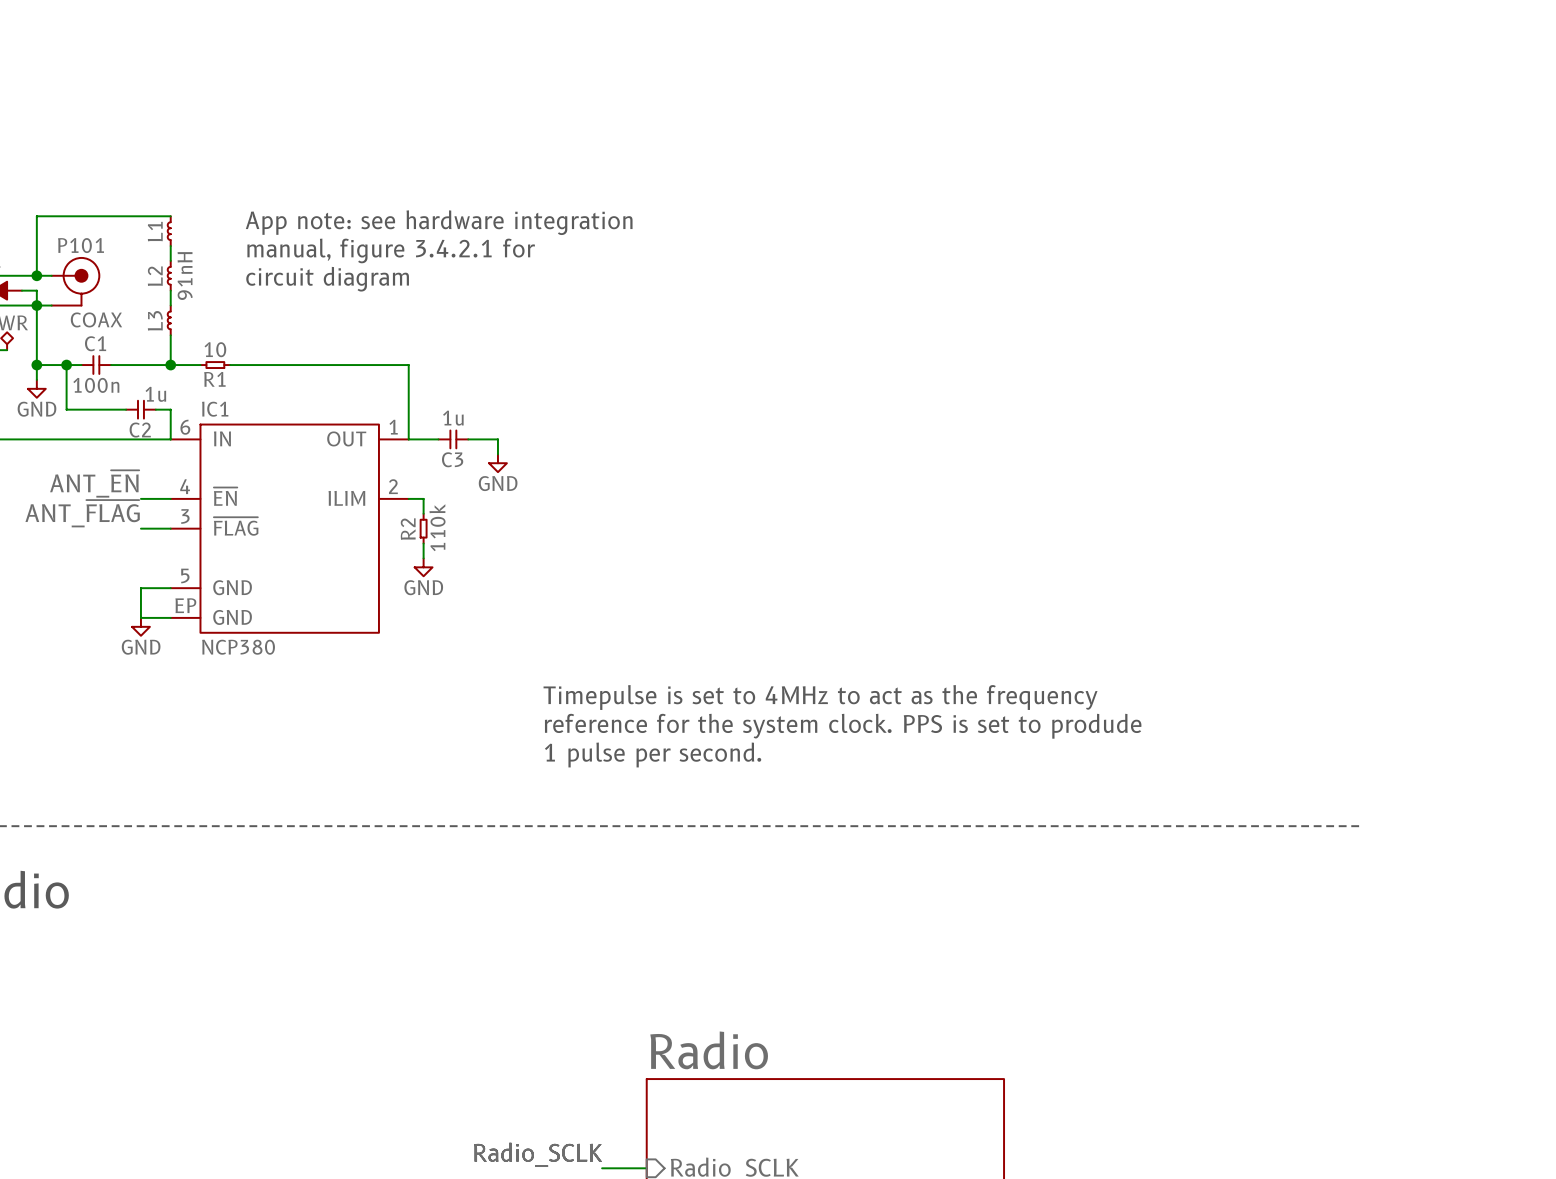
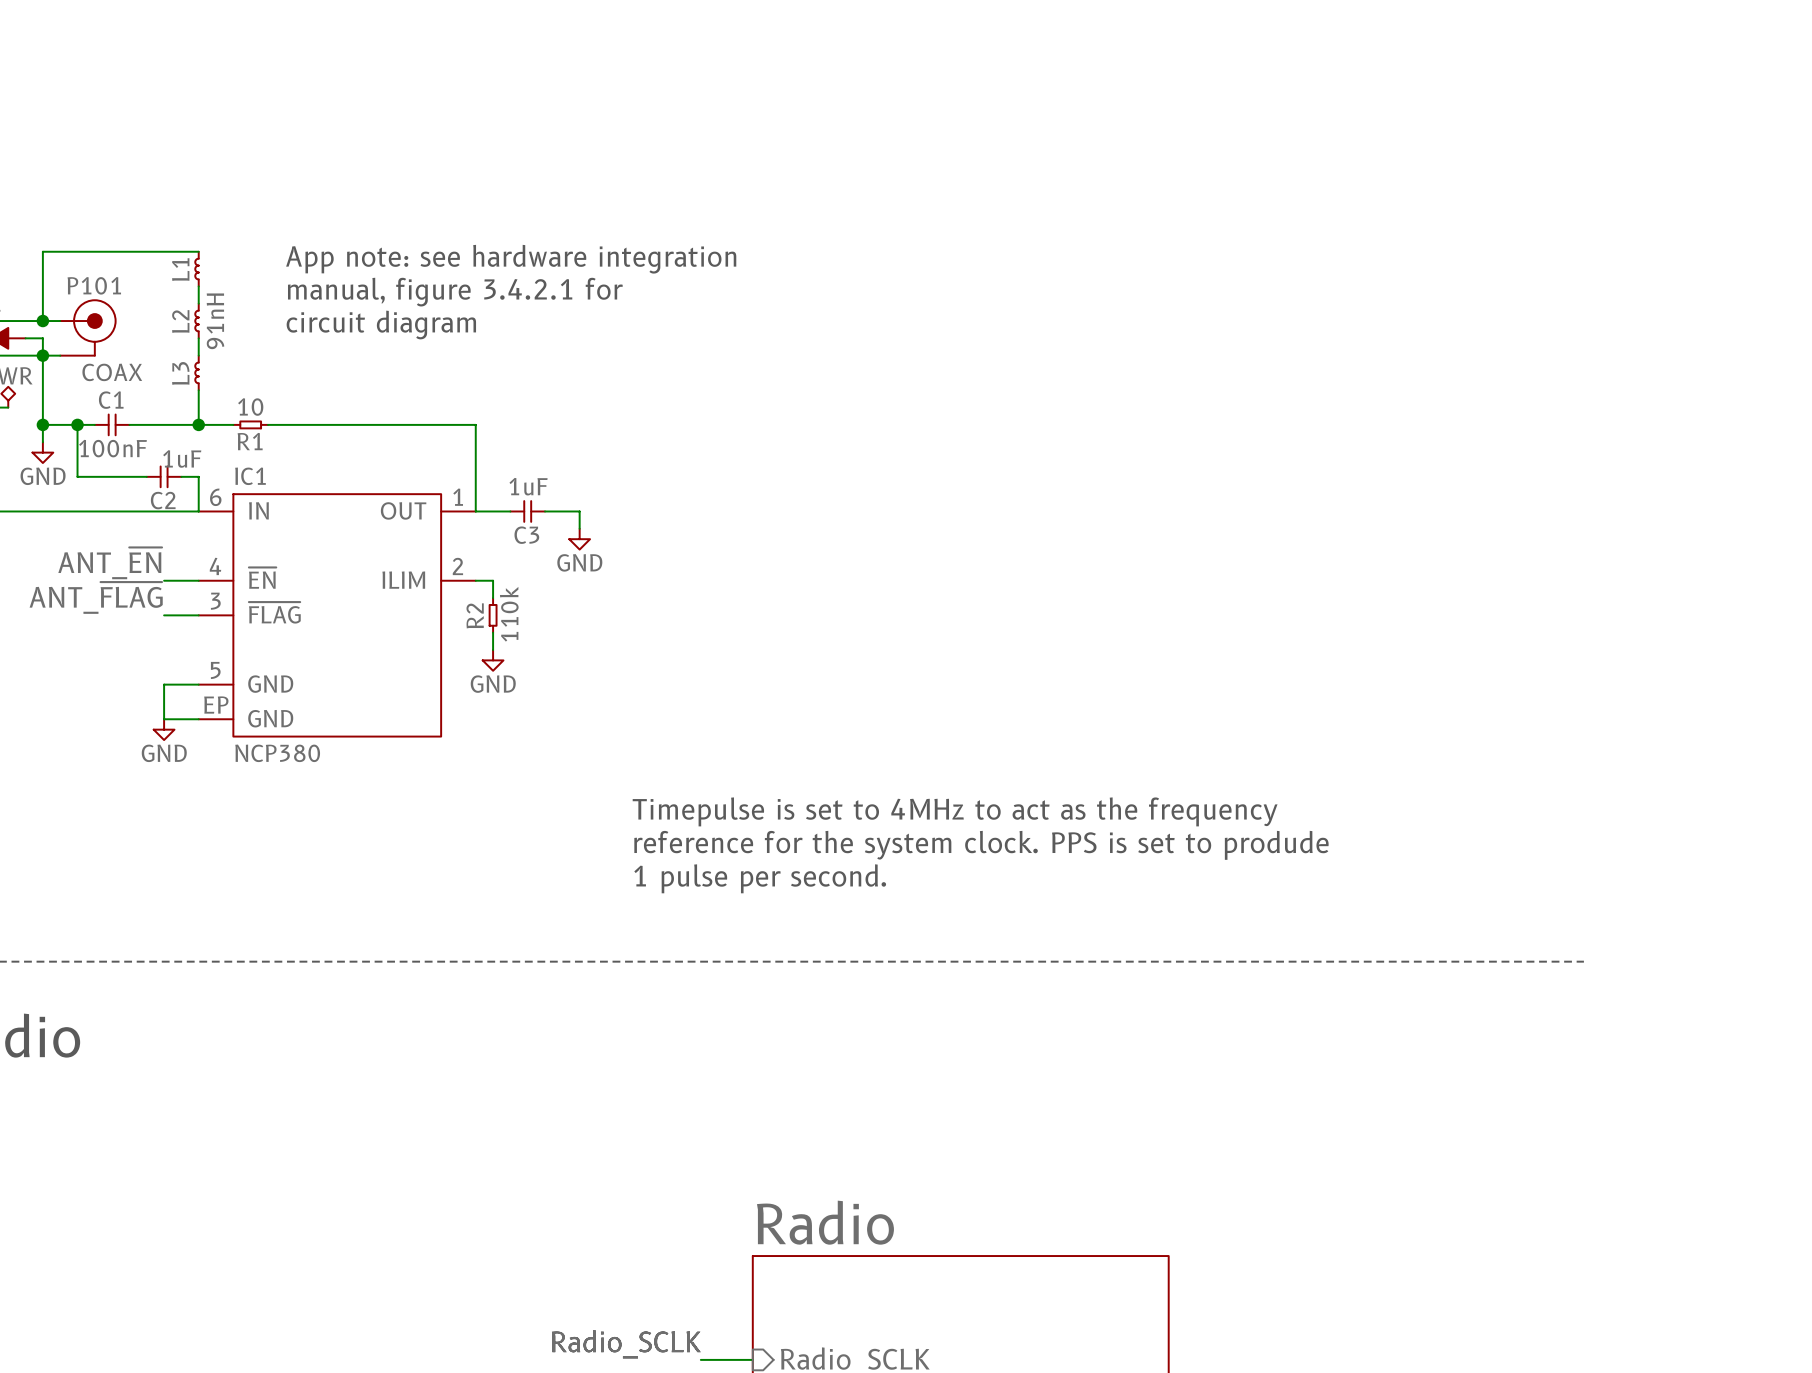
C1 value: 100n (96, 385) -> 100nF (112, 448)
C2 value: 1u (155, 394) -> 1uF (182, 458)
C3 value: 1u (453, 418) -> 1uF (528, 486)

